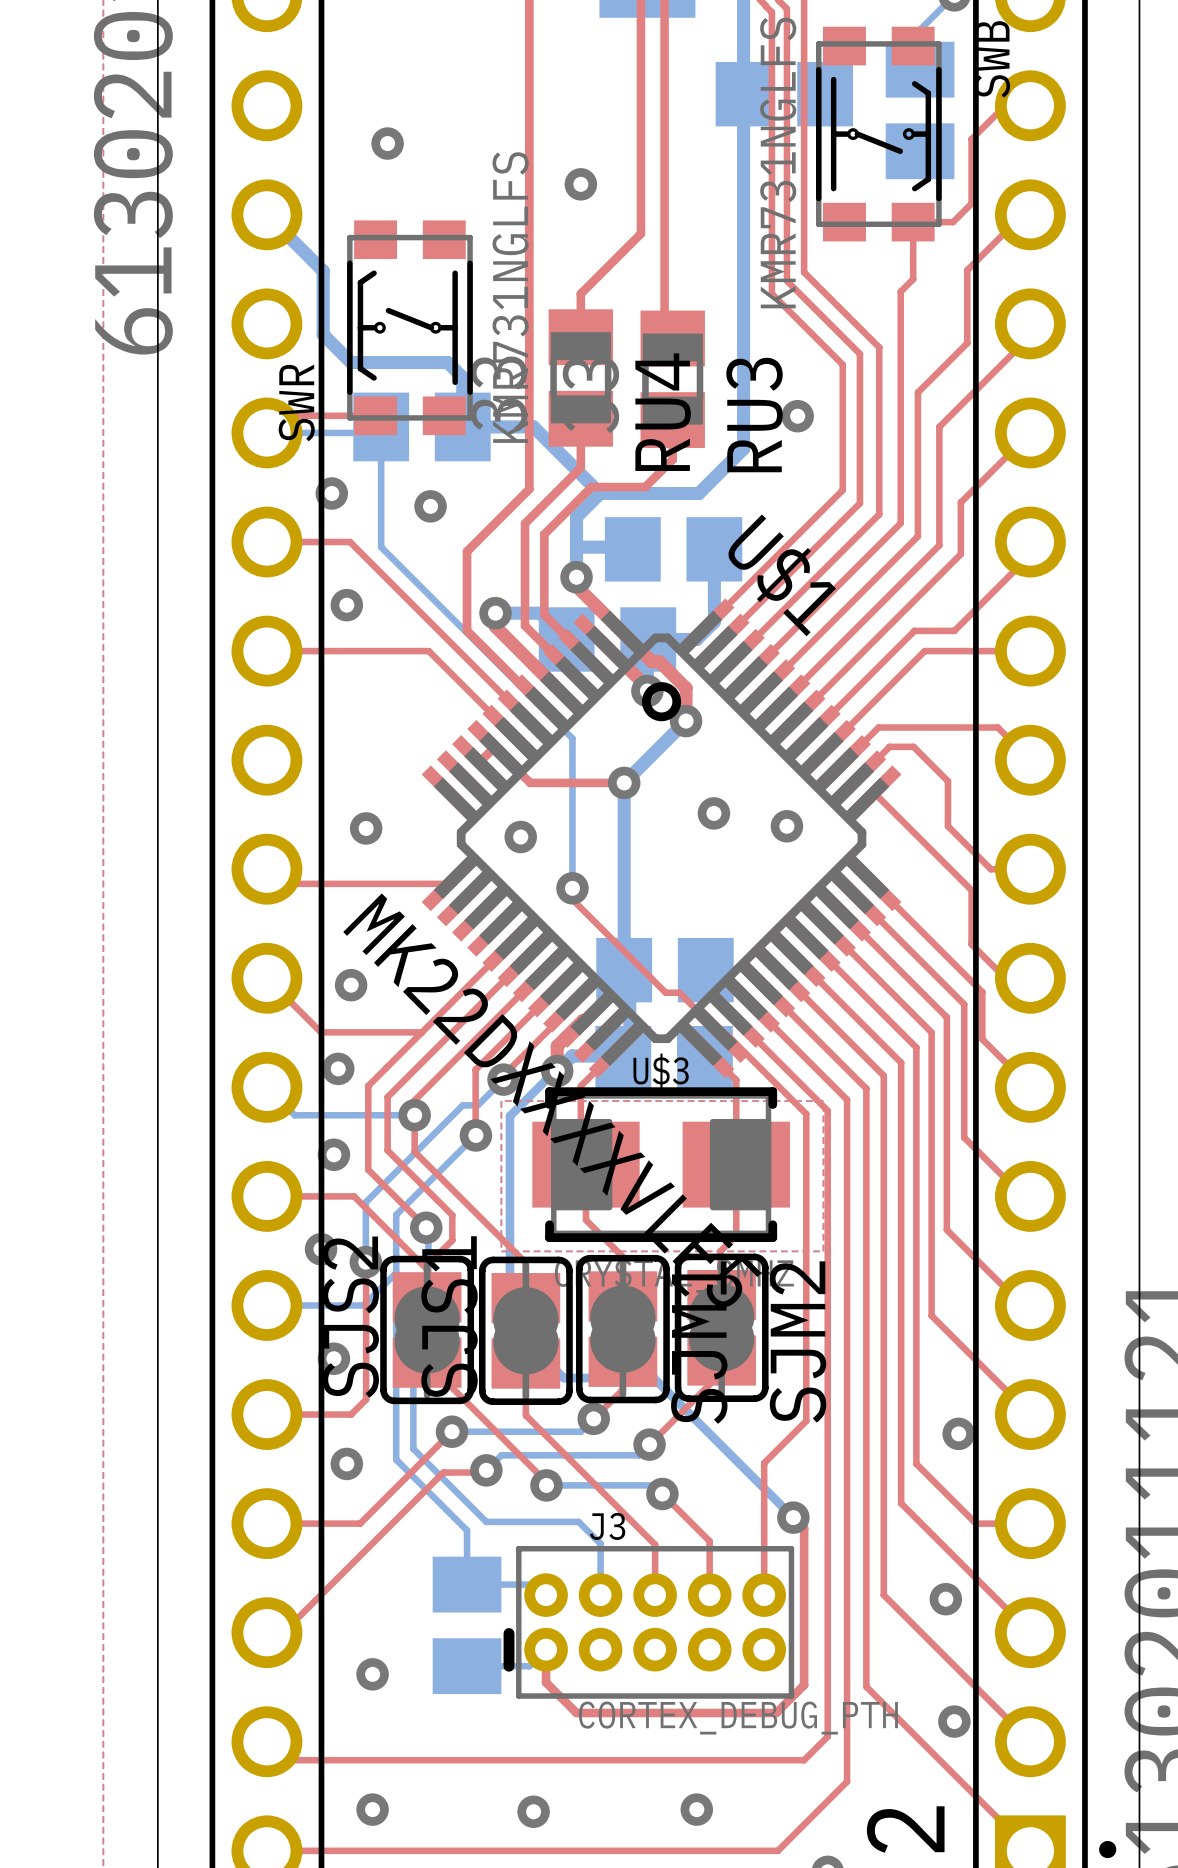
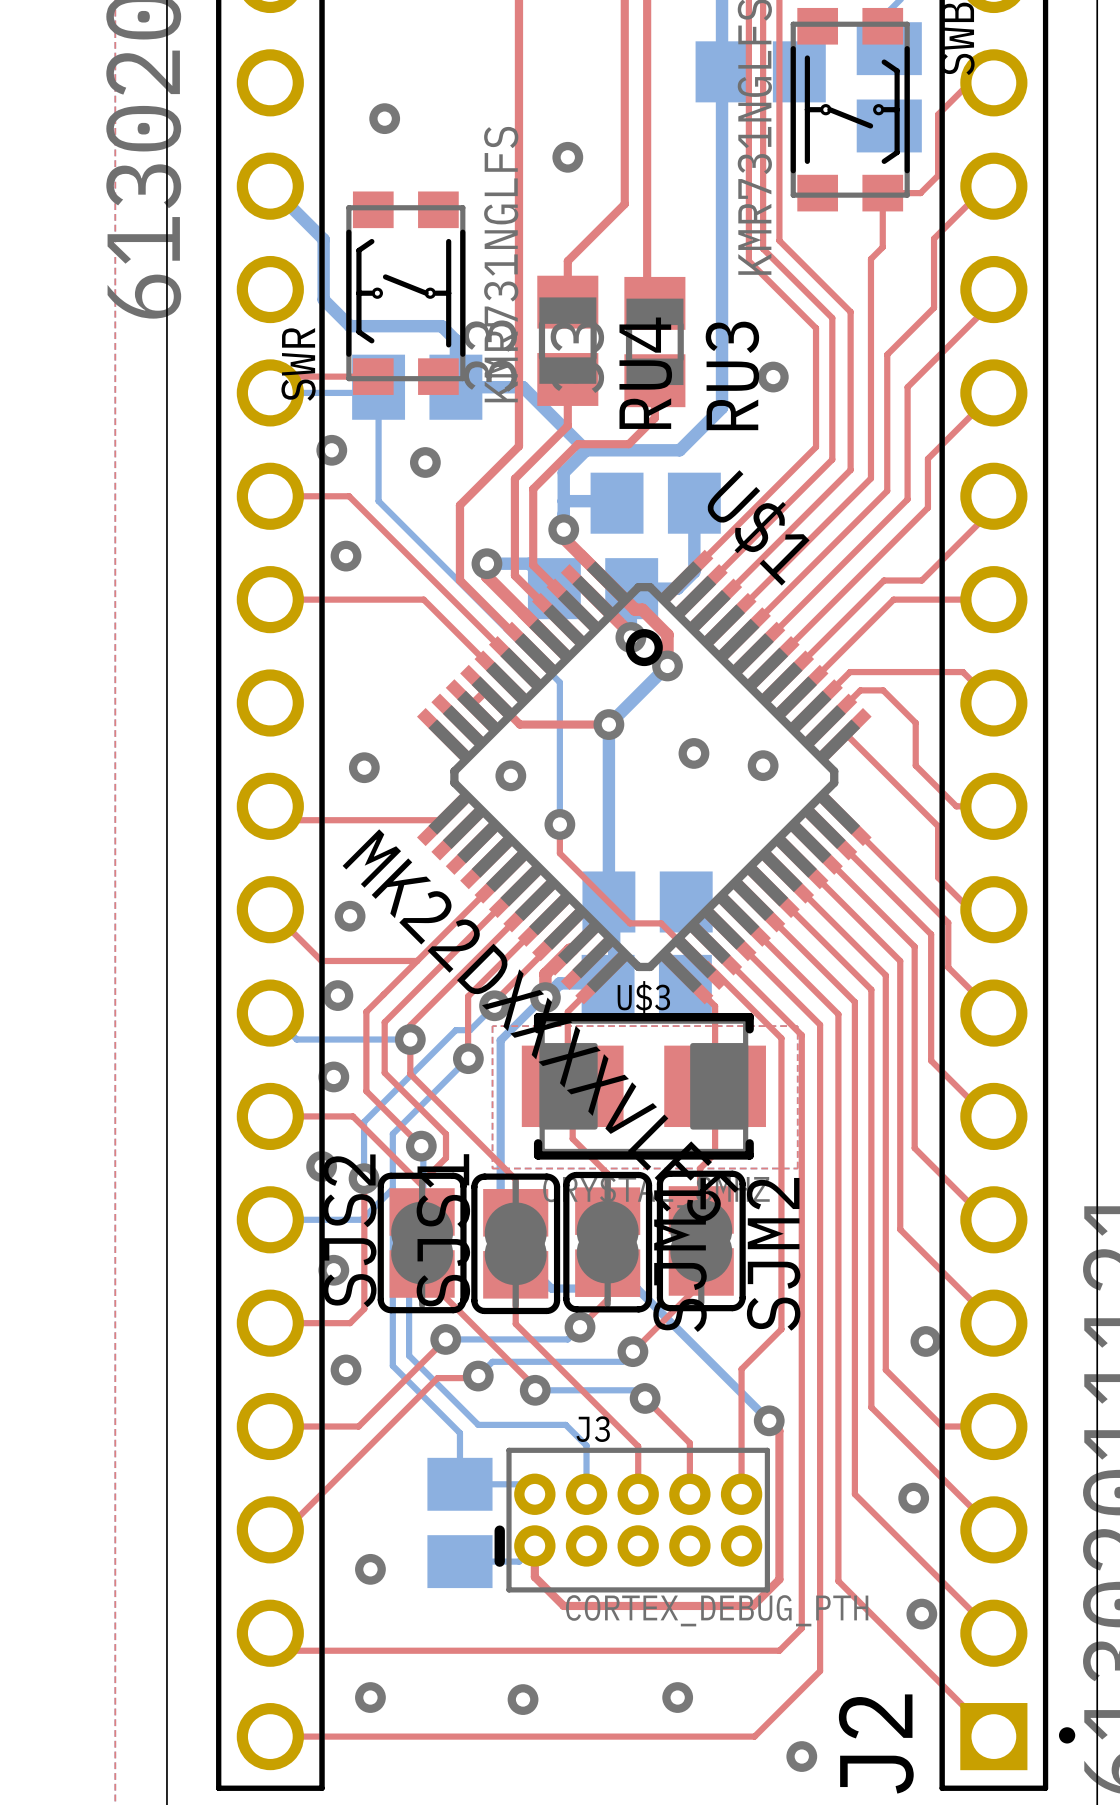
top track: (572, 899) (665, 992) -> (559, 835) (559, 853) (629, 923) (648, 923)

